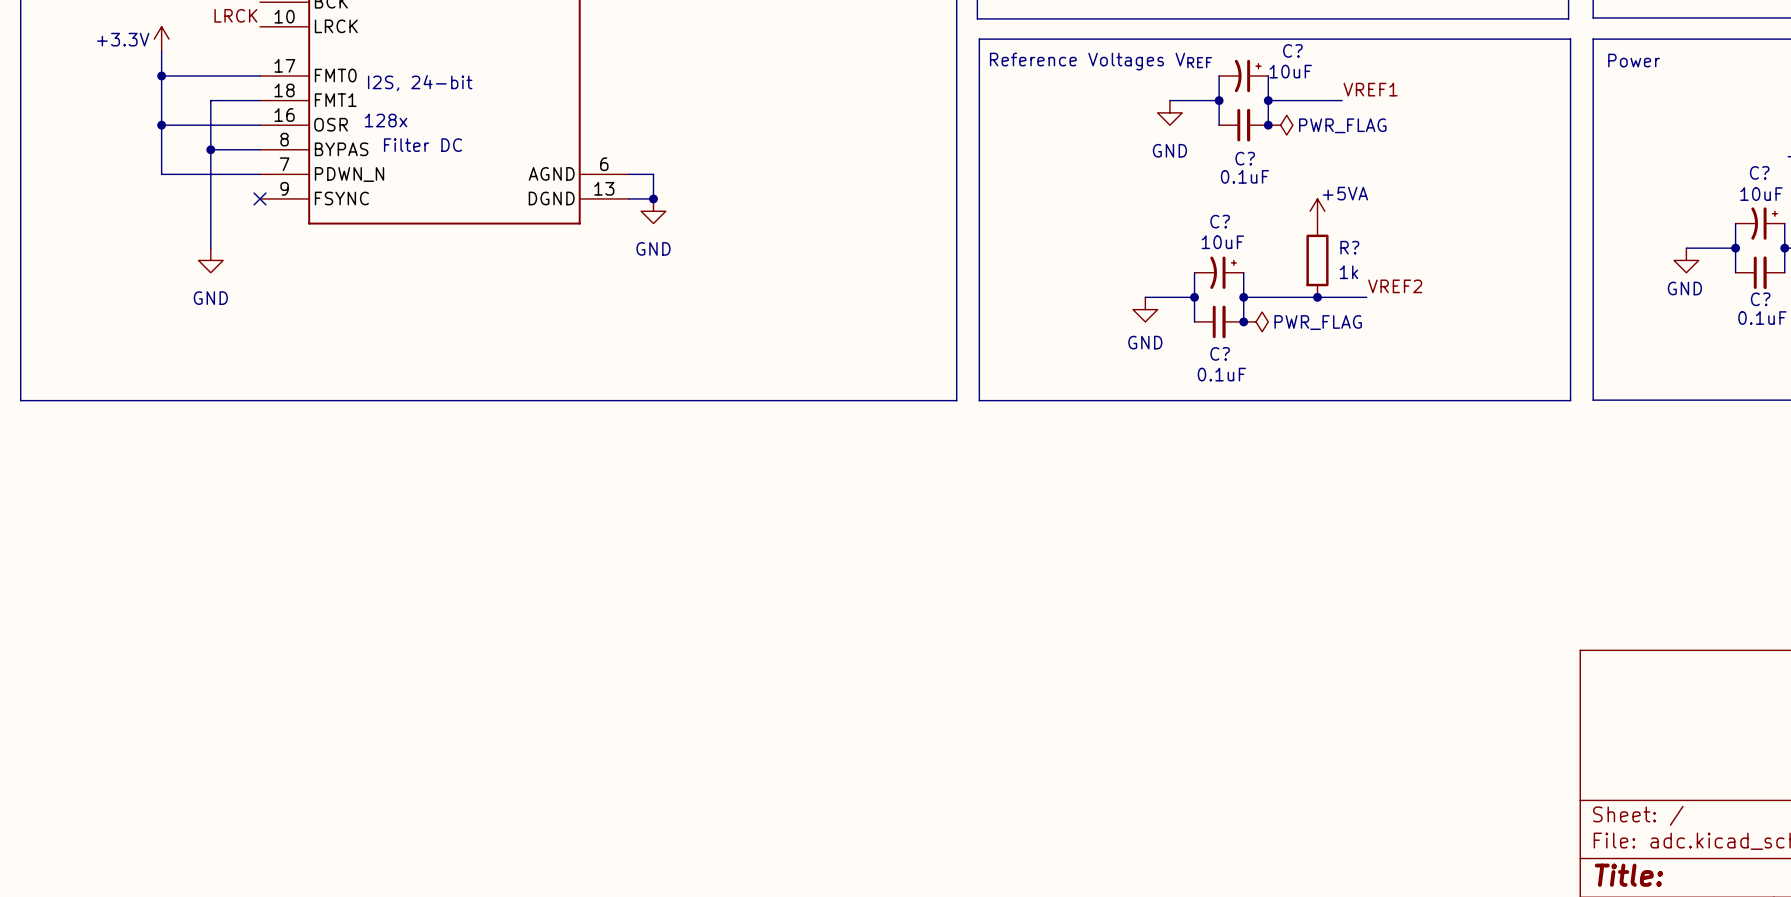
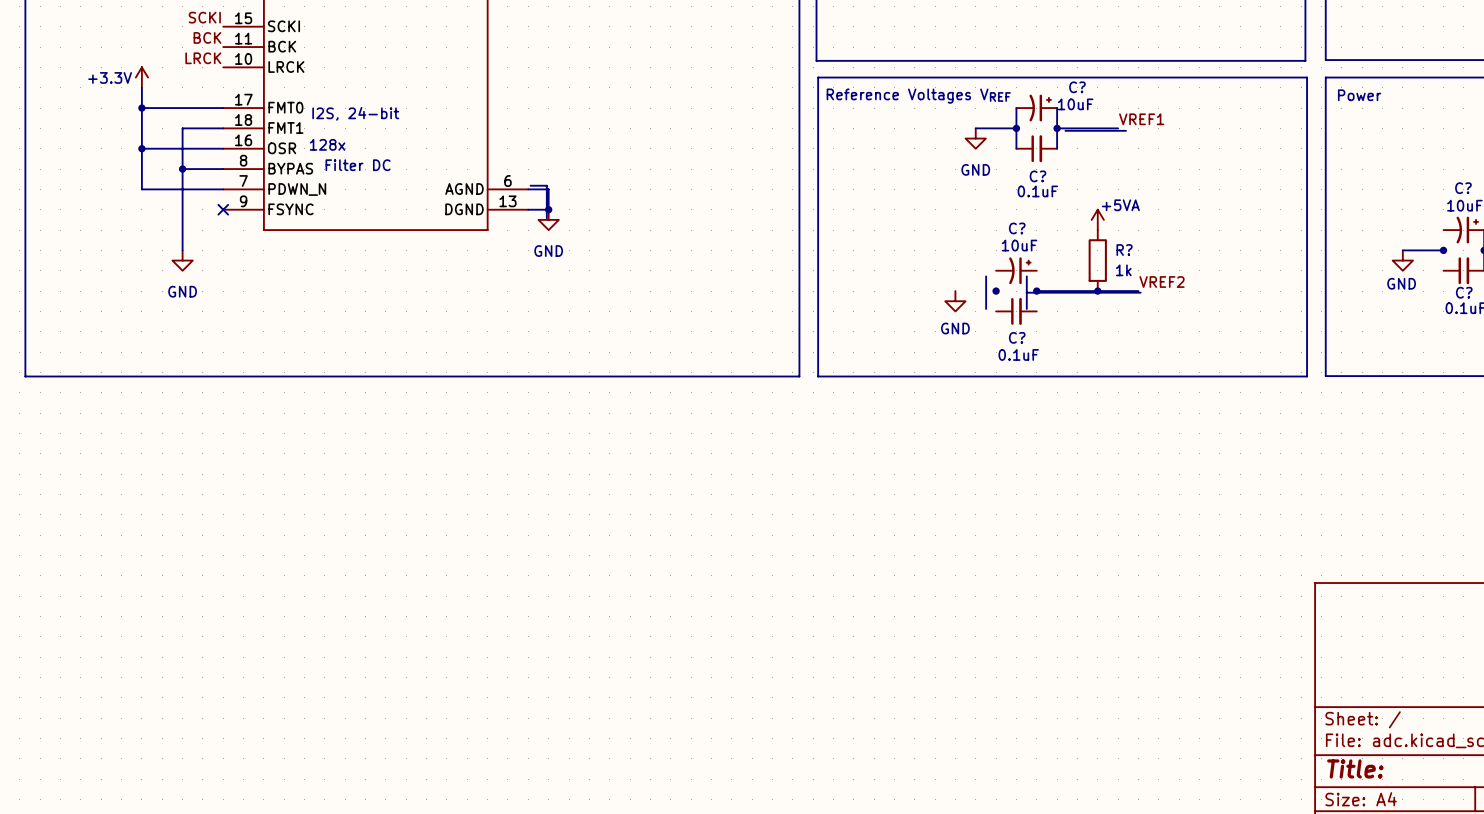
wire: none -> (1065, 130) (1126, 130)
junction: (1268, 125) -> none
power symbol: PWR_FLAG (1280, 125) -> none
wire: none -> (530, 185) (546, 185) (546, 218)
wire: (1735, 223) (1735, 272) -> none
wire: (1194, 272) (1194, 321) -> none
wire: (1243, 272) (1243, 321) -> none
wire: none -> (986, 276) (986, 308)
wire: none -> (1026, 276) (1026, 308)
wire: (1145, 297) (1194, 297) -> none
wire: none -> (1026, 292) (1140, 292)
junction: (1243, 321) -> none
power symbol: PWR_FLAG (1256, 321) -> none

